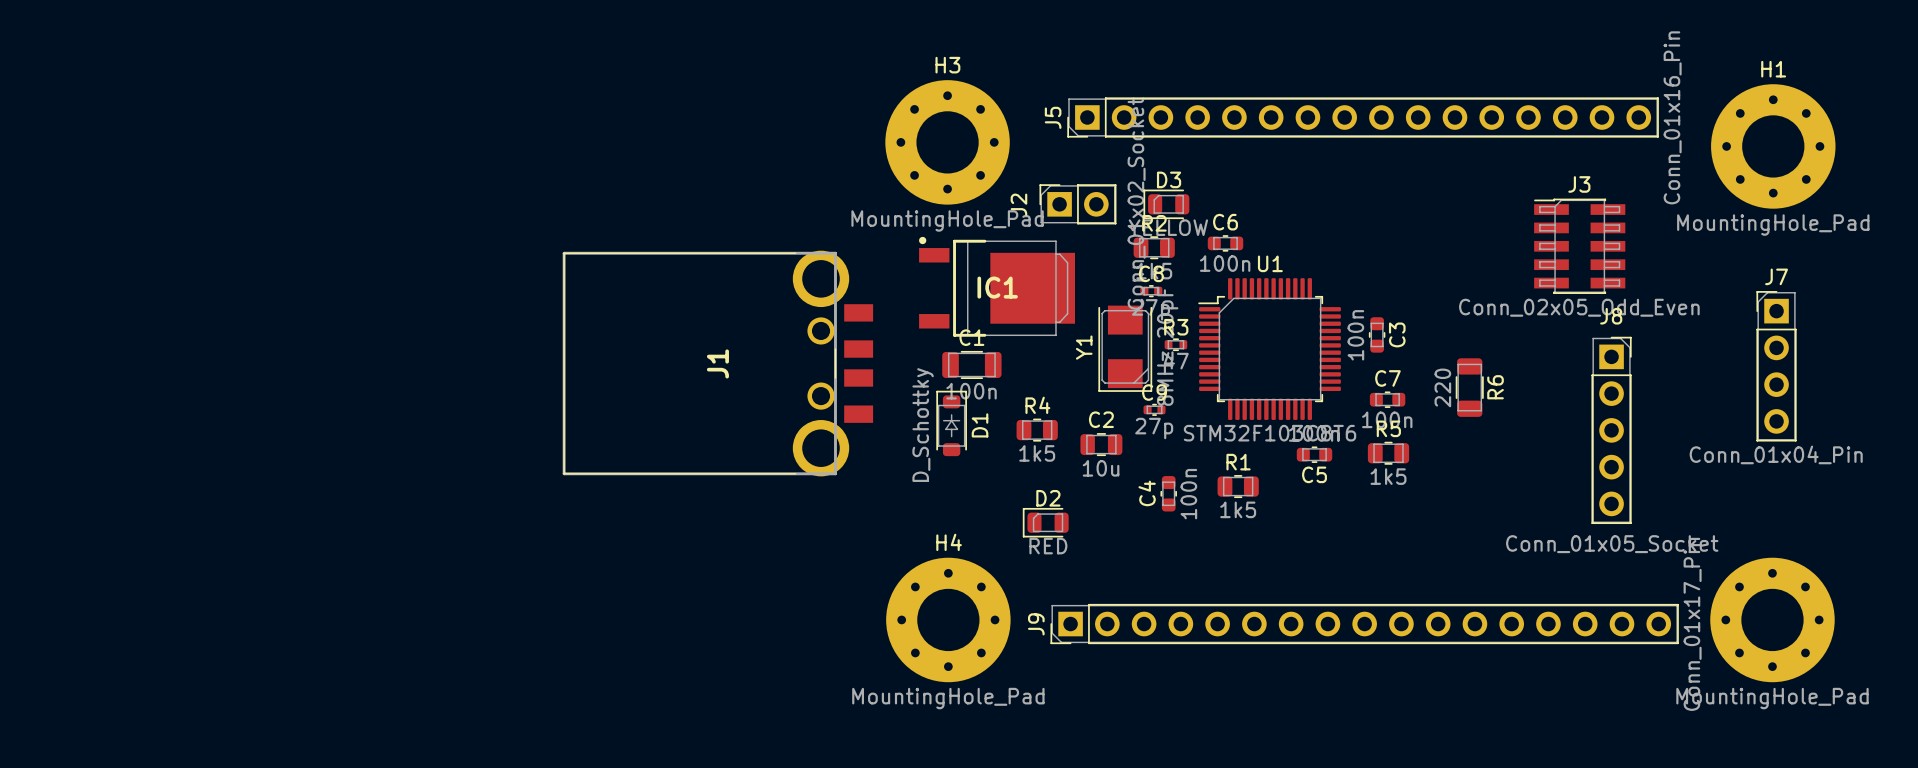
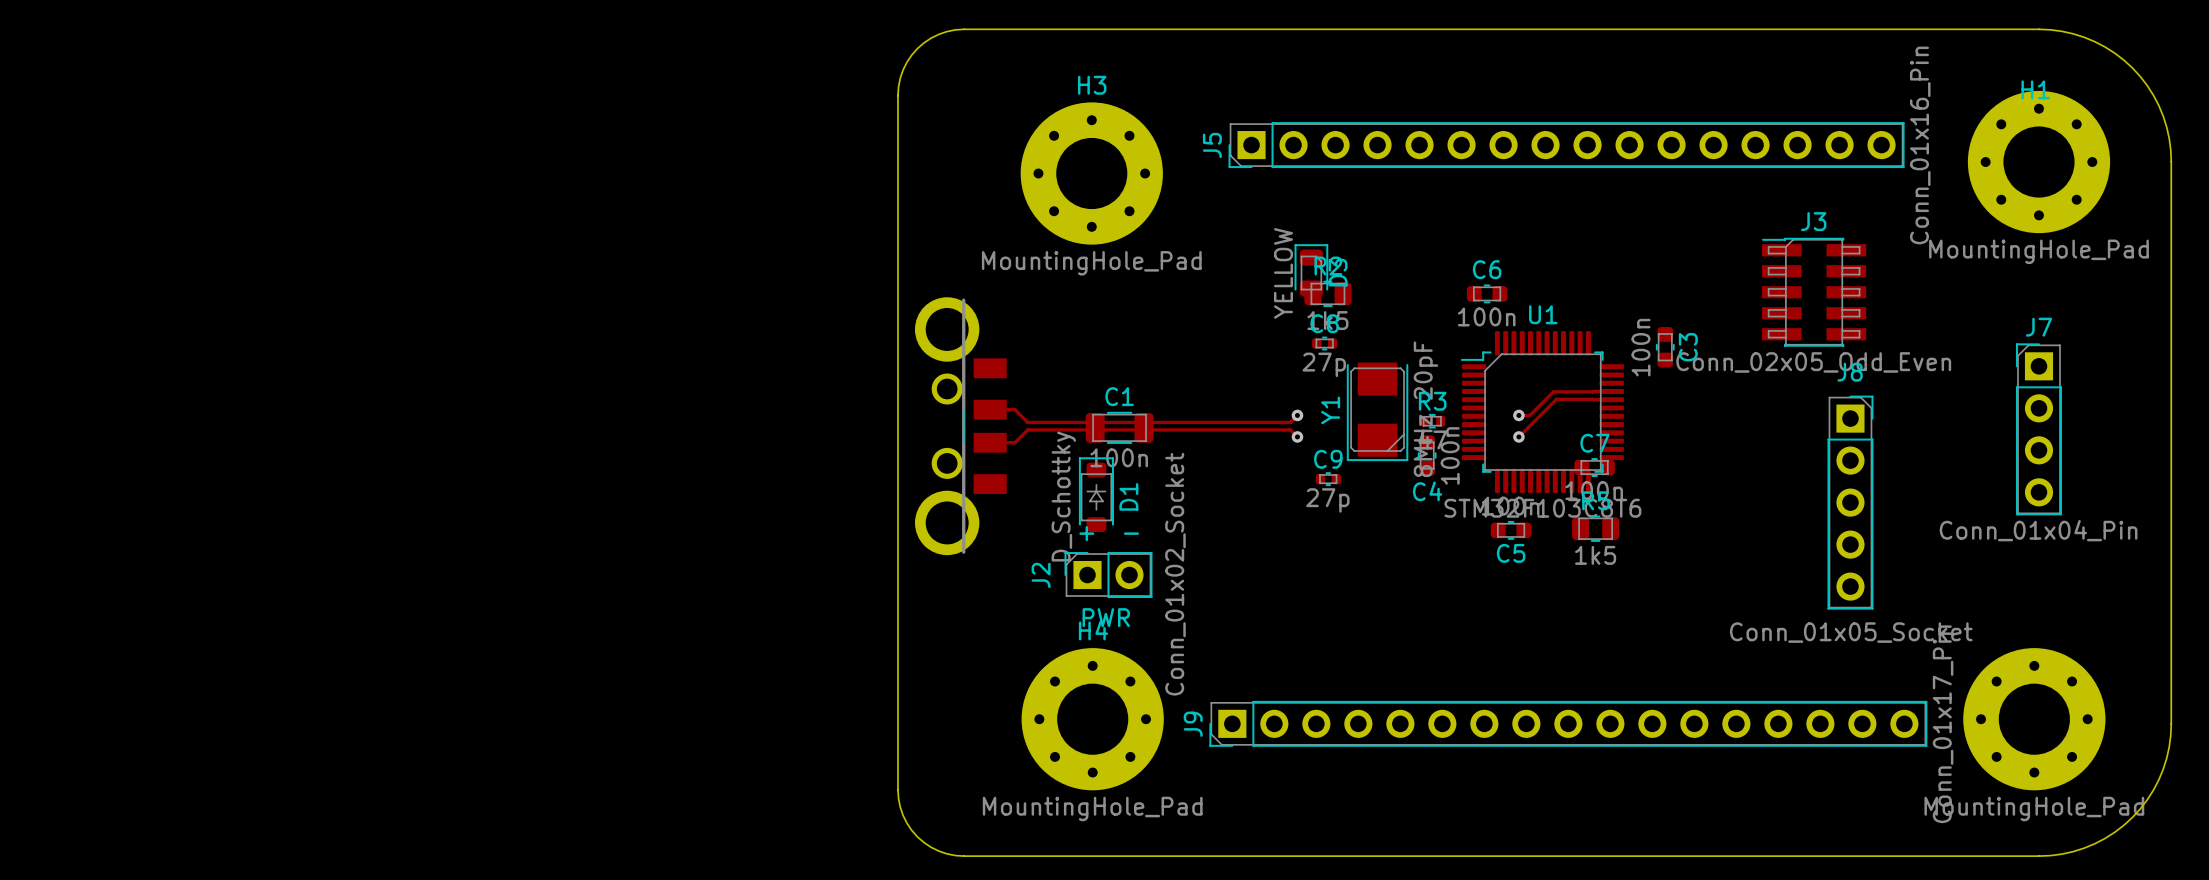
board edge: none -> (964, 29) (2038, 29) (2061, 31) (2084, 37) (2114, 53) (2140, 76) (2158, 105) (2169, 138) (2171, 161) (2171, 723) (2166, 758) (2158, 779) (2147, 799) (2124, 825) (2094, 843) (2061, 854) (2038, 856) (964, 856) (947, 853) (931, 847) (917, 836) (906, 823) (900, 807) (897, 789) (897, 95) (903, 70) (917, 48) (938, 34) (964, 29)
H1 position: (1773, 146) -> (2038, 162)
J2 position: (1077, 204) -> (1108, 575)
D3 rotation: 0° (1166, 204) -> 90° clockwise (1311, 270)
D3 position: (1166, 204) -> (1311, 270)
C6 position: (1225, 243) -> (1487, 293)
IC1: (997, 286) -> none
track: none -> (1611, 391) (1553, 391) (1529, 415) (1518, 415)
C3 position: (1377, 334) -> (1665, 347)
track: none -> (1611, 399) (1556, 399) (1518, 436)
R3 position: (1175, 344) -> (1432, 421)
Y1 position: (1125, 348) -> (1377, 411)
track: none -> (990, 409) (1014, 409) (1027, 422) (1290, 422) (1297, 415)
U1 position: (1269, 349) -> (1542, 412)
via: none -> (1297, 415)
via: none -> (1518, 415)
J1: (717, 363) -> none
part: none -> (960, 426)
track: none -> (1297, 436) (1290, 429) (1027, 429) (1014, 442) (990, 442)
via: none -> (1297, 436)
via: none -> (1518, 436)
R6: 220 (1469, 387) -> none
R4: 1k5 (1037, 430) -> none
C2: 10u (1101, 444) -> none
text: none -> + (1086, 533)
text: none -> - (1131, 533)
R1: 1k5 (1238, 486) -> none
C4 name rotation: 0° (1147, 493) -> 90° clockwise (1427, 491)
C4 name position: C4 (1147, 493) -> C4 (1427, 491)
C4 position: (1168, 493) -> (1427, 455)
D2: RED (1045, 522) -> none
text: none -> PWR (1106, 617)

